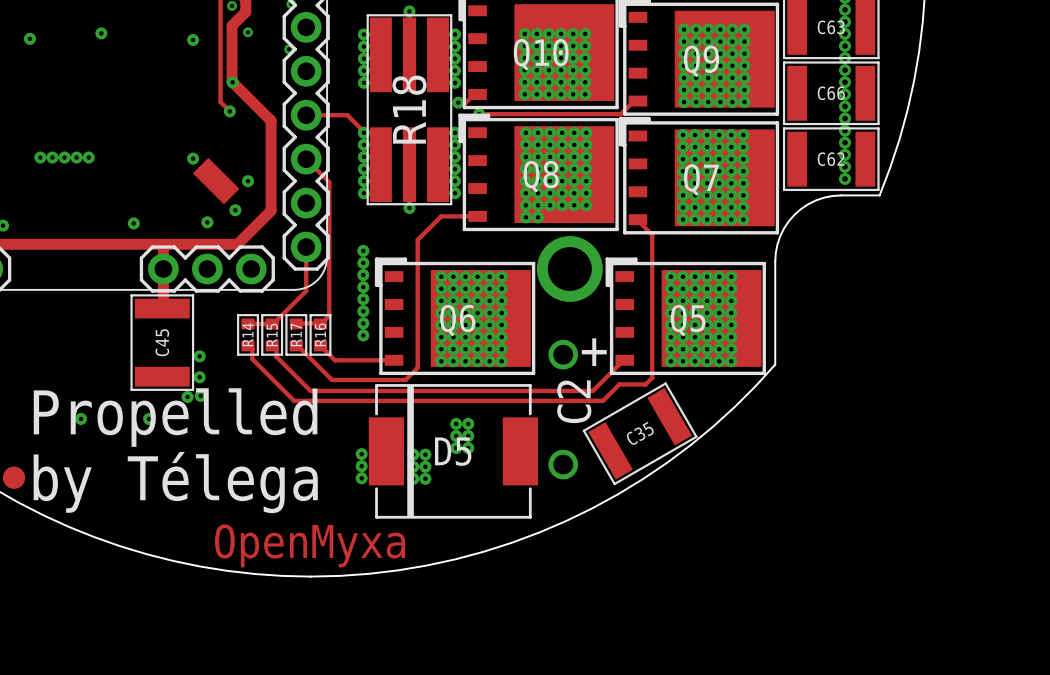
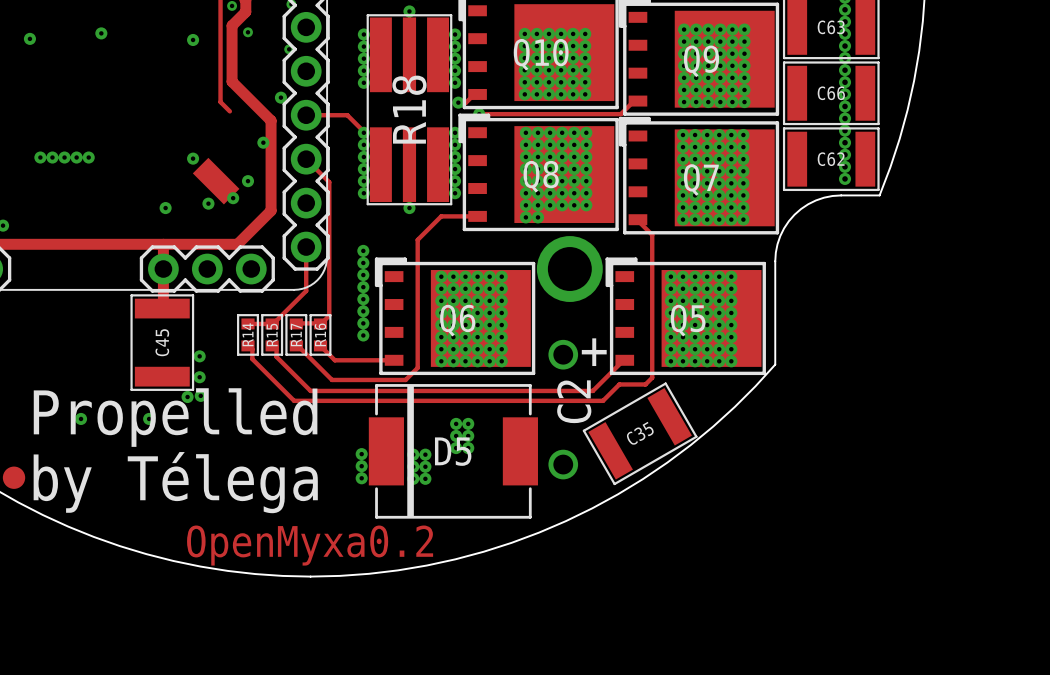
via: (232, 82) -> none
via: none -> (280, 97)
via: (229, 111) -> none
via: none -> (263, 142)
via: none -> (208, 203)
via: none -> (165, 208)
via position: (235, 210) -> (233, 198)
via: (207, 222) -> none
via: (133, 223) -> none
text: OpenMyxa (310, 545) -> OpenMyxa0.2 (310, 545)

